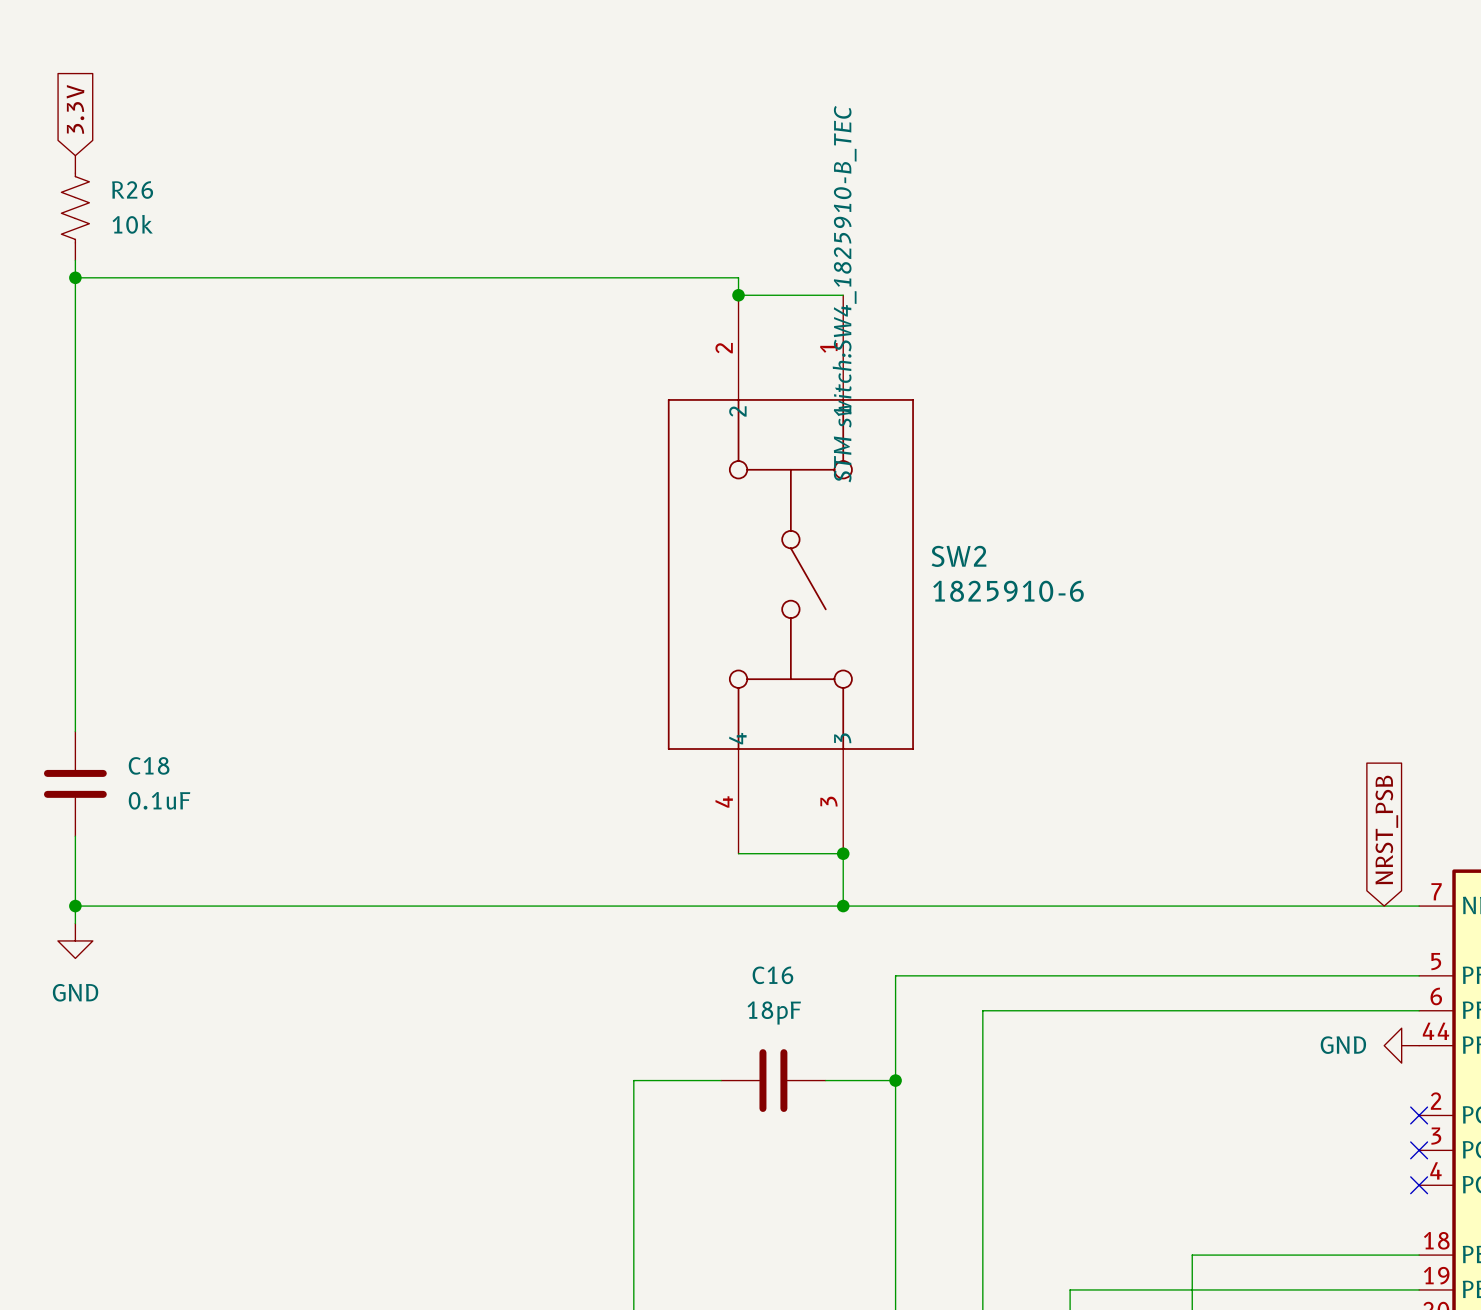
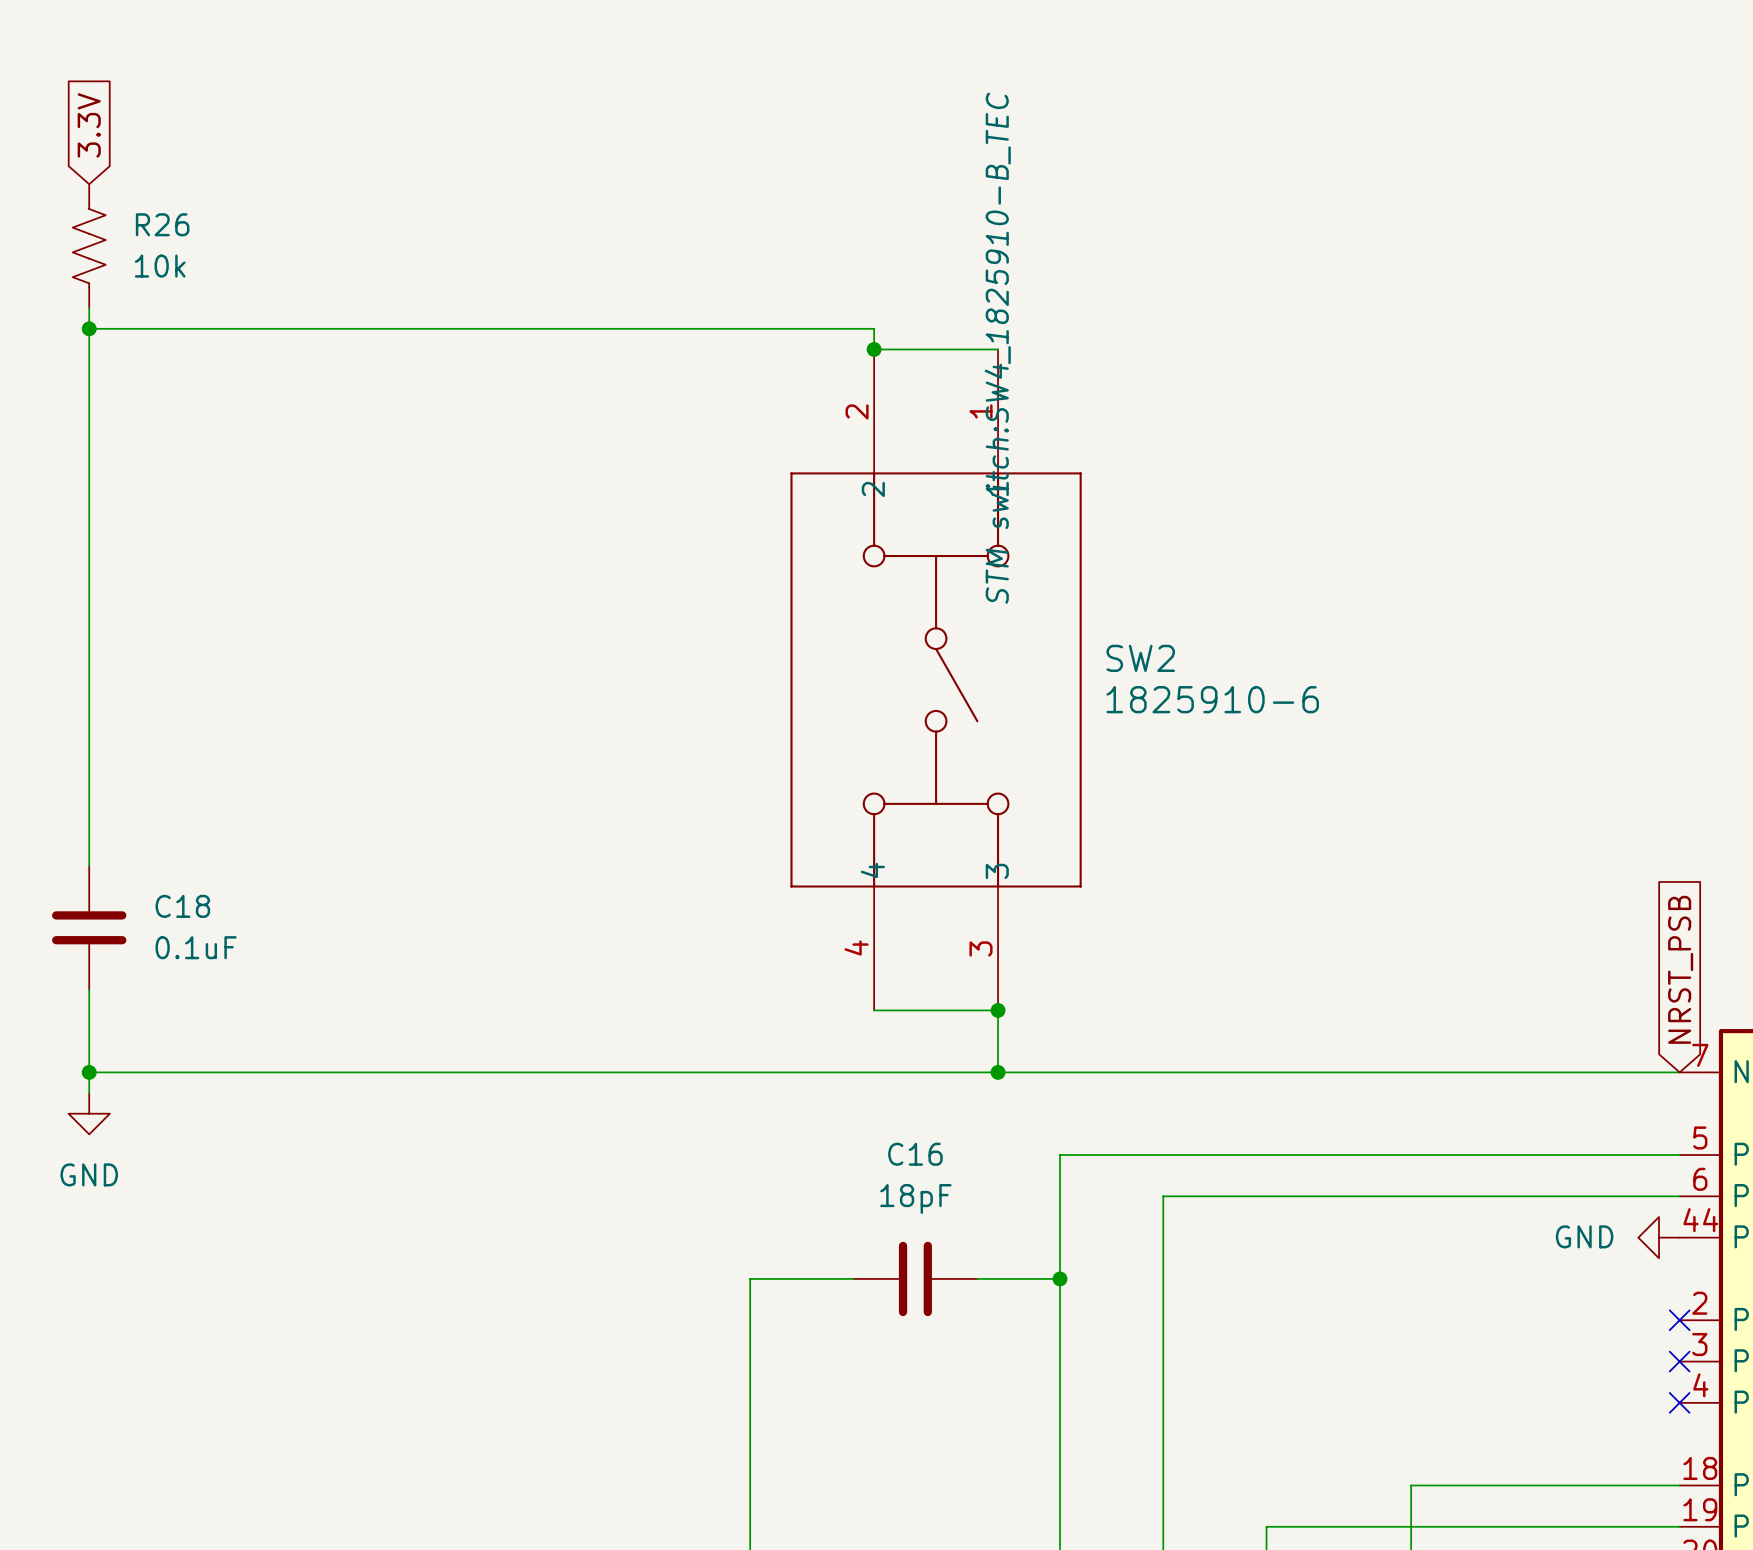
global label position: NRST_PSB (1386, 830) -> NRST_PSB (1680, 969)

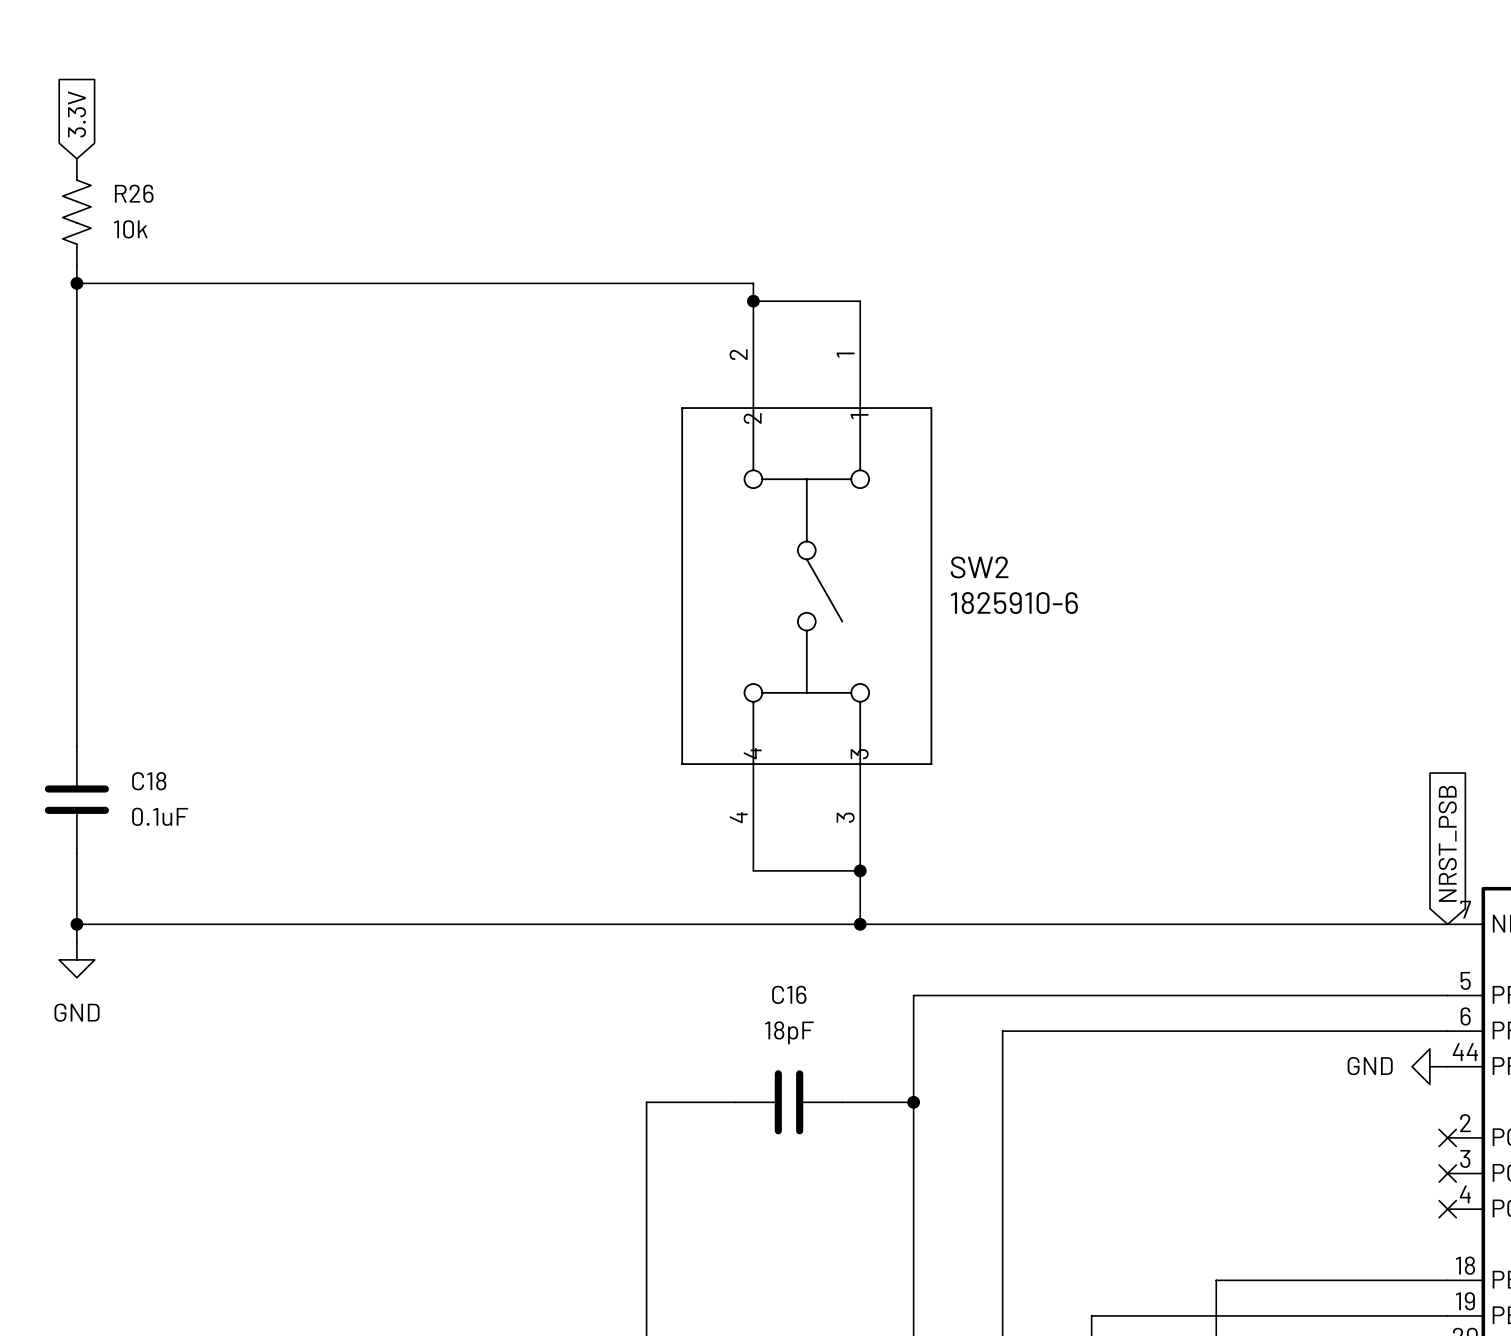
SW2 text: STM switch:SW4_1825910-B_TEC (997, 348) -> none

